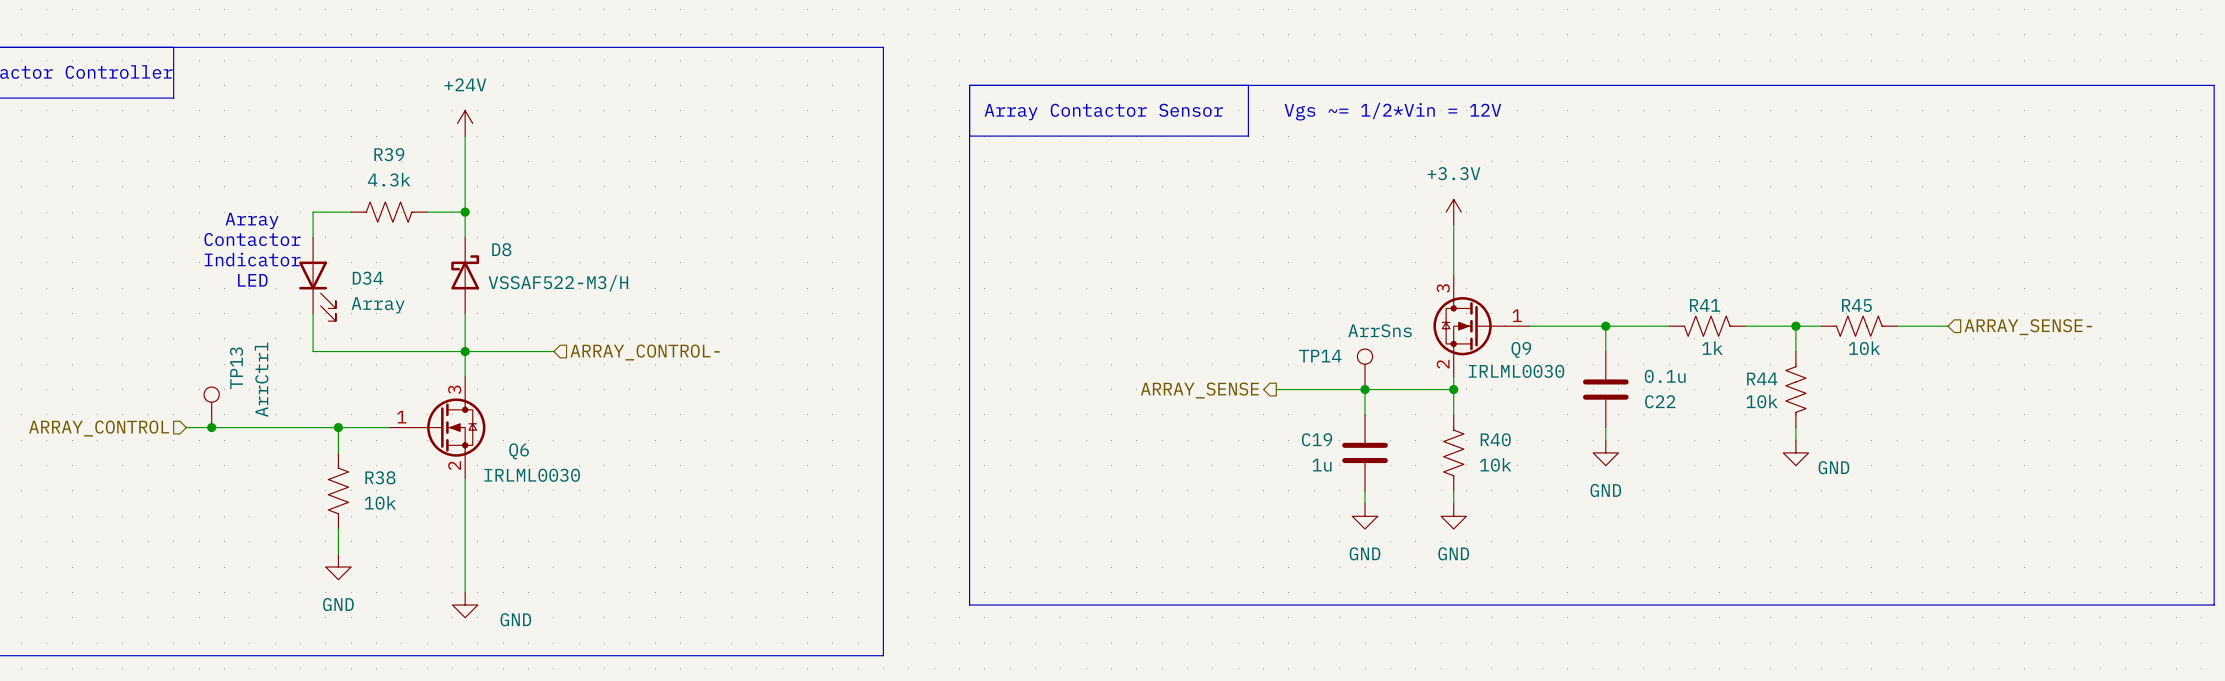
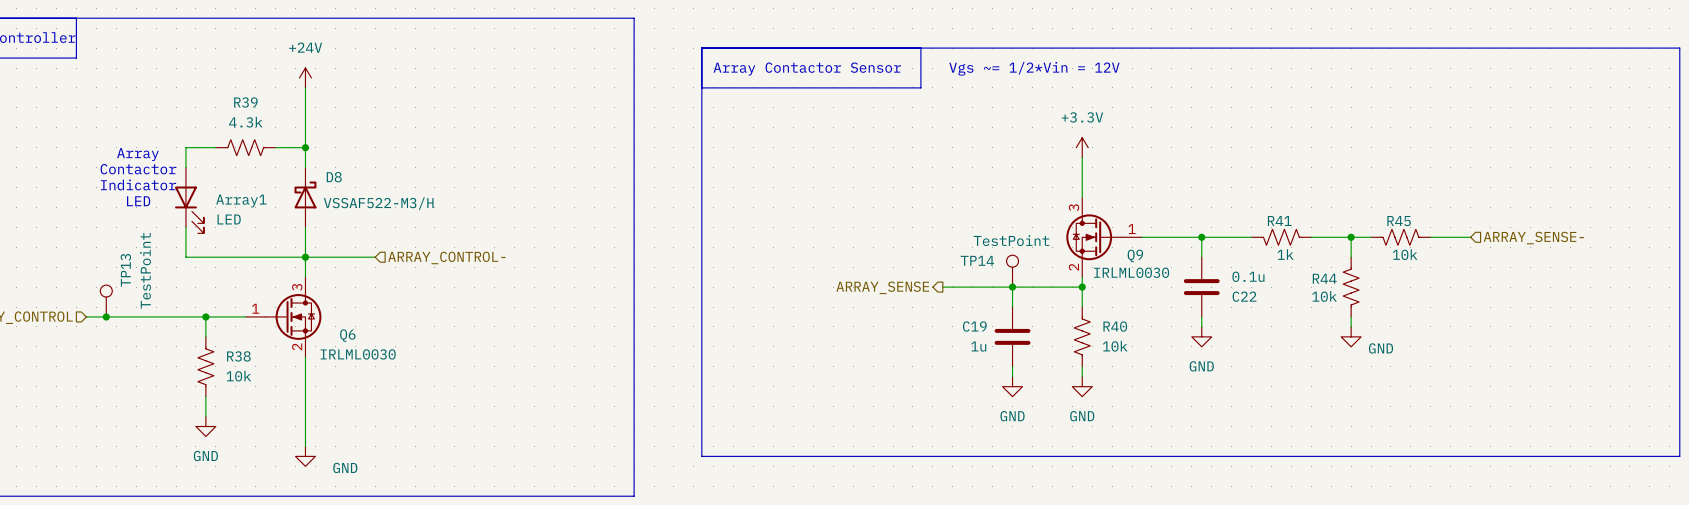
D34 name: D34 (367, 278) -> Array1 (241, 201)
D34 value: Array (378, 305) -> LED (229, 219)
TP14 value: ArrSns (1380, 330) -> TestPoint (1011, 240)
TP13 value: ArrCtrl (261, 379) -> TestPoint (145, 270)

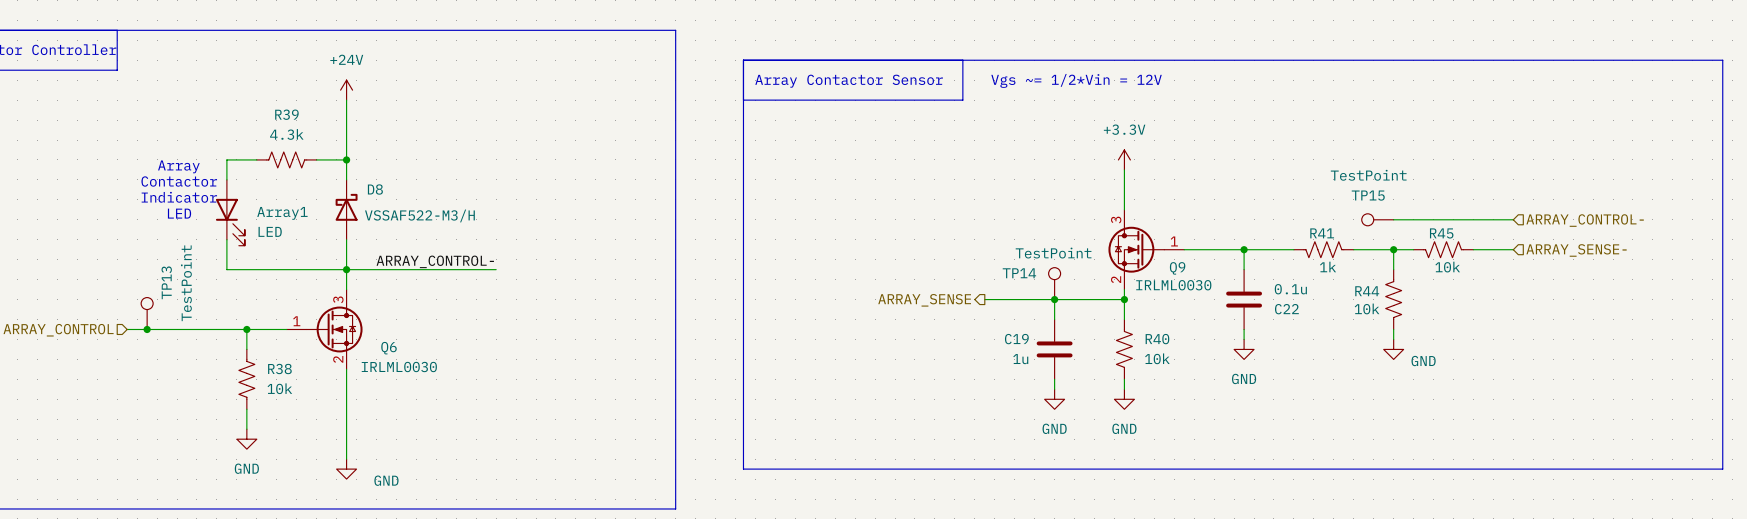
TP15: none -> TestPoint (1377, 219)
wire: none -> (1393, 219) (1513, 219)
hierarchical label: none -> ARRAY_CONTROL- (1585, 220)
label: none -> ARRAY_CONTROL- (435, 261)
wire: none -> (416, 269) (496, 269)
hierarchical label: ARRAY_CONTROL- (446, 257) -> none

